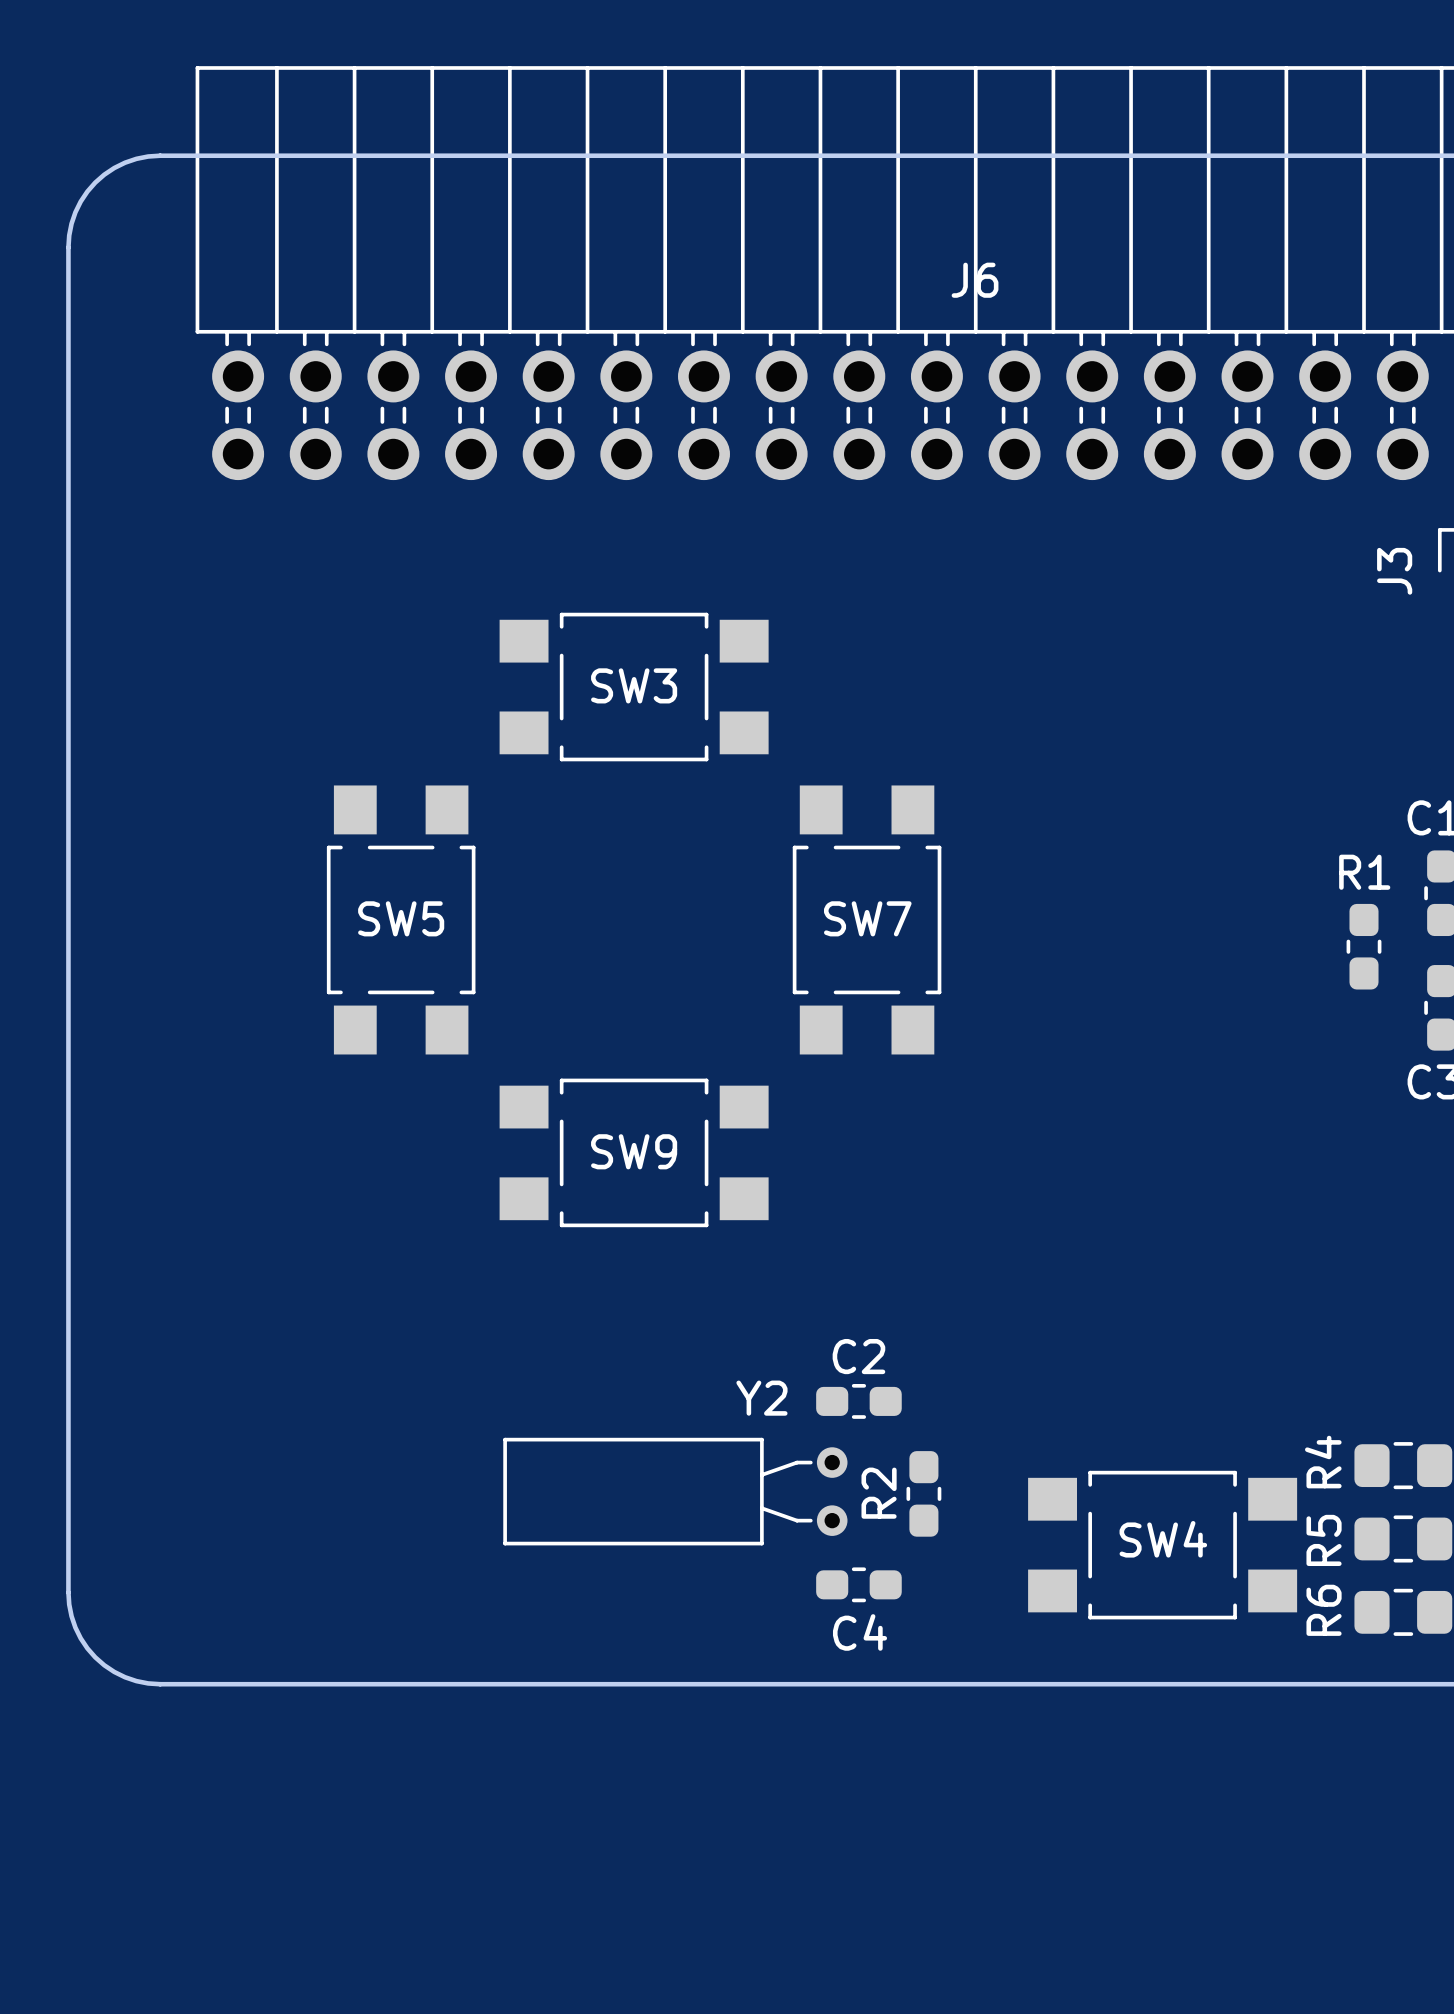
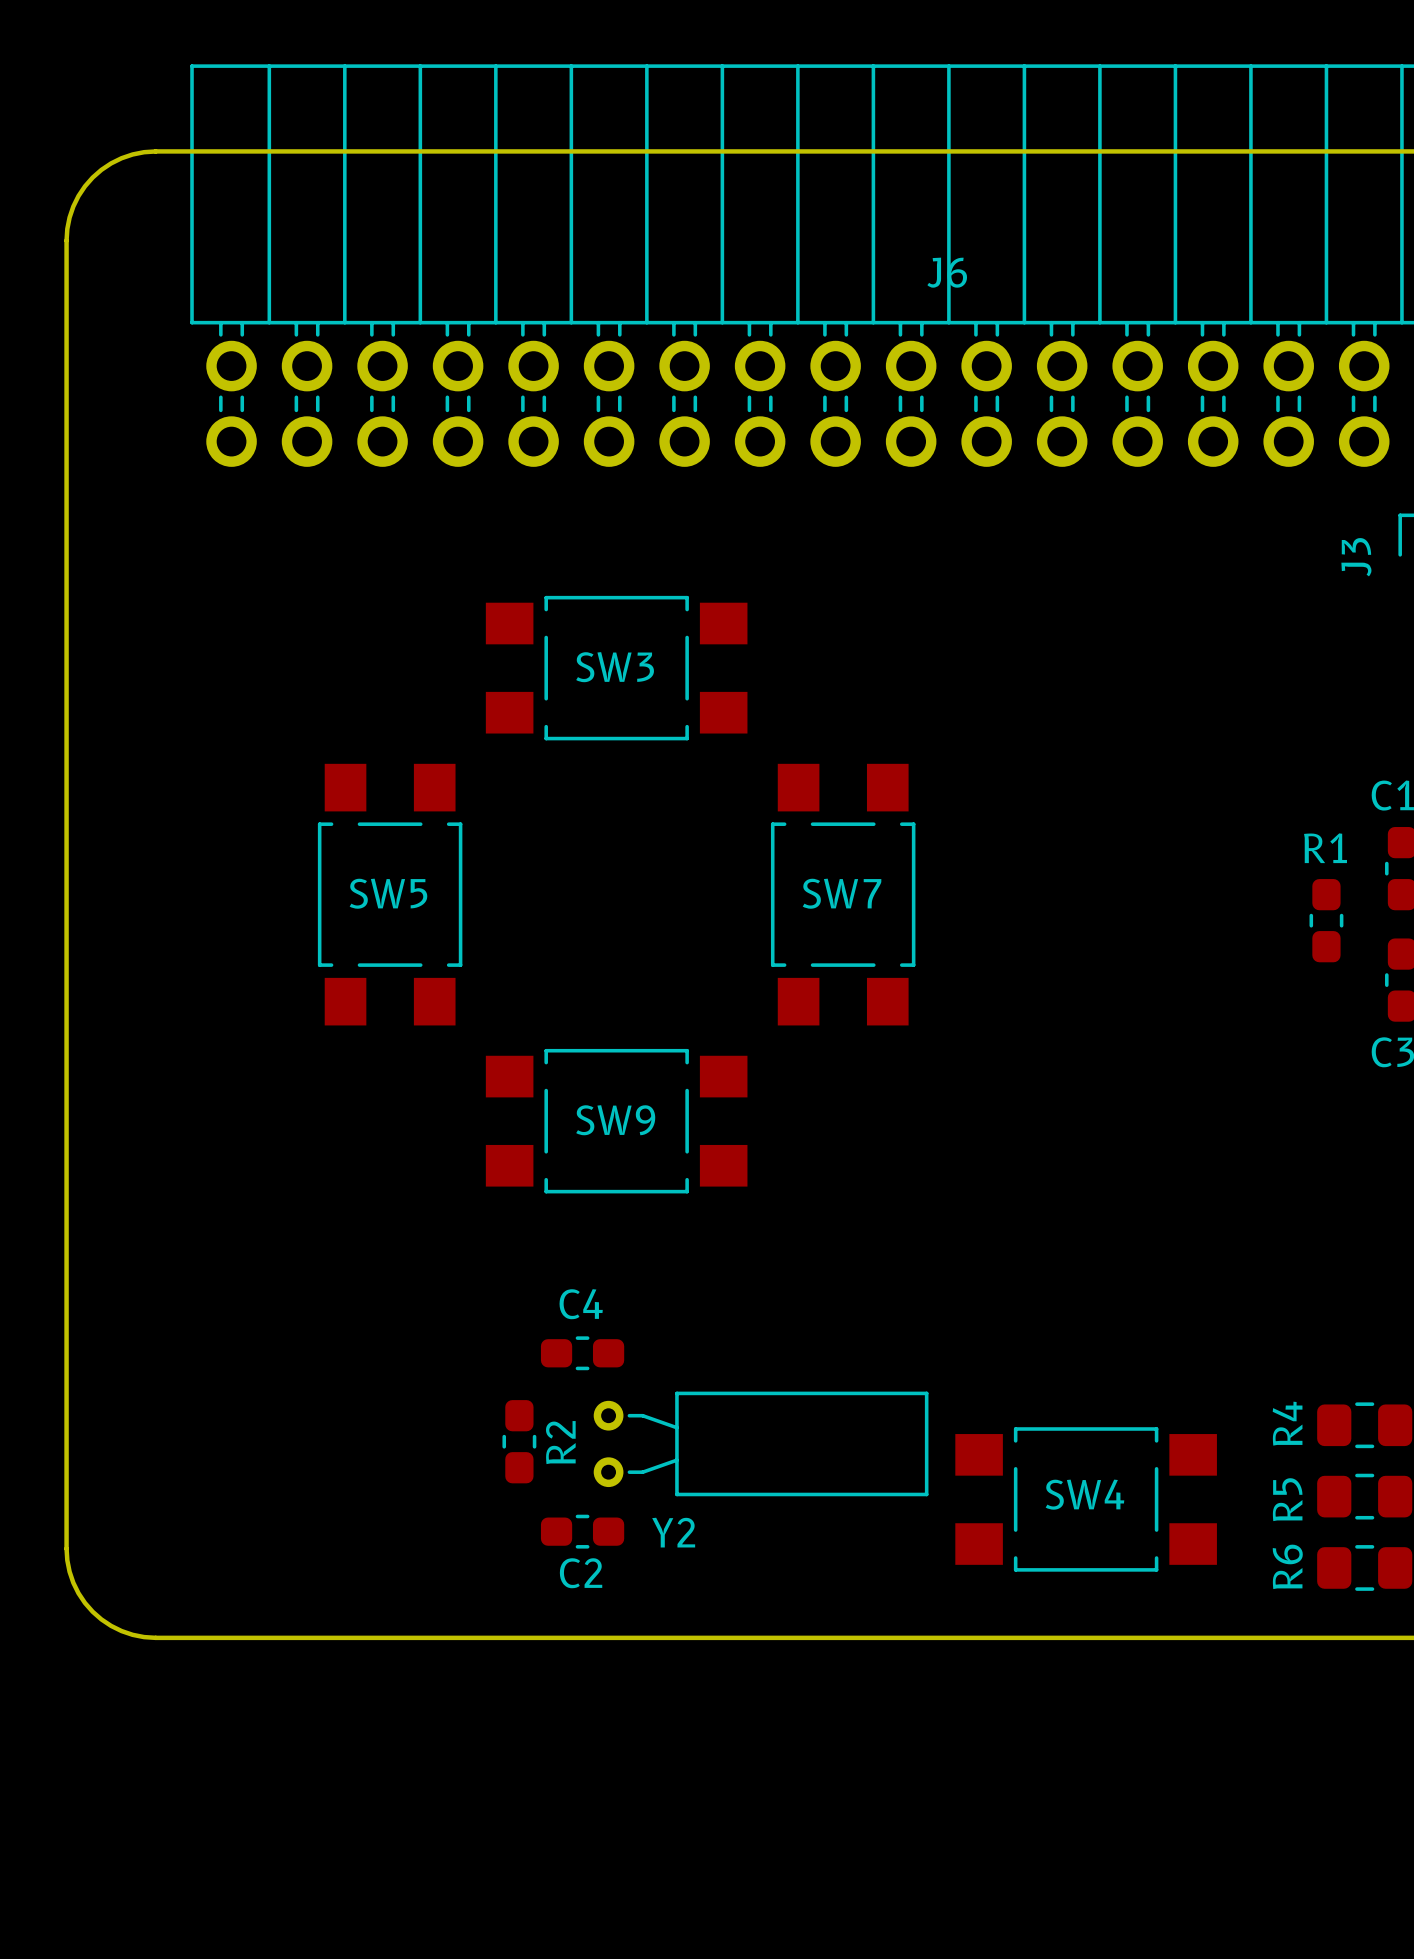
C2 name position: C2 (858, 1356) -> C2 (581, 1573)
C2 position: (858, 1401) -> (582, 1531)
Y2 rotation: 0° (675, 1491) -> 180° (761, 1443)
R2 name position: R2 (879, 1493) -> R2 (560, 1442)
R2 position: (923, 1493) -> (519, 1441)
SW4 position: (1162, 1545) -> (1086, 1499)
C4 position: (858, 1584) -> (582, 1353)
C4 name position: C4 (860, 1632) -> C4 (581, 1304)

